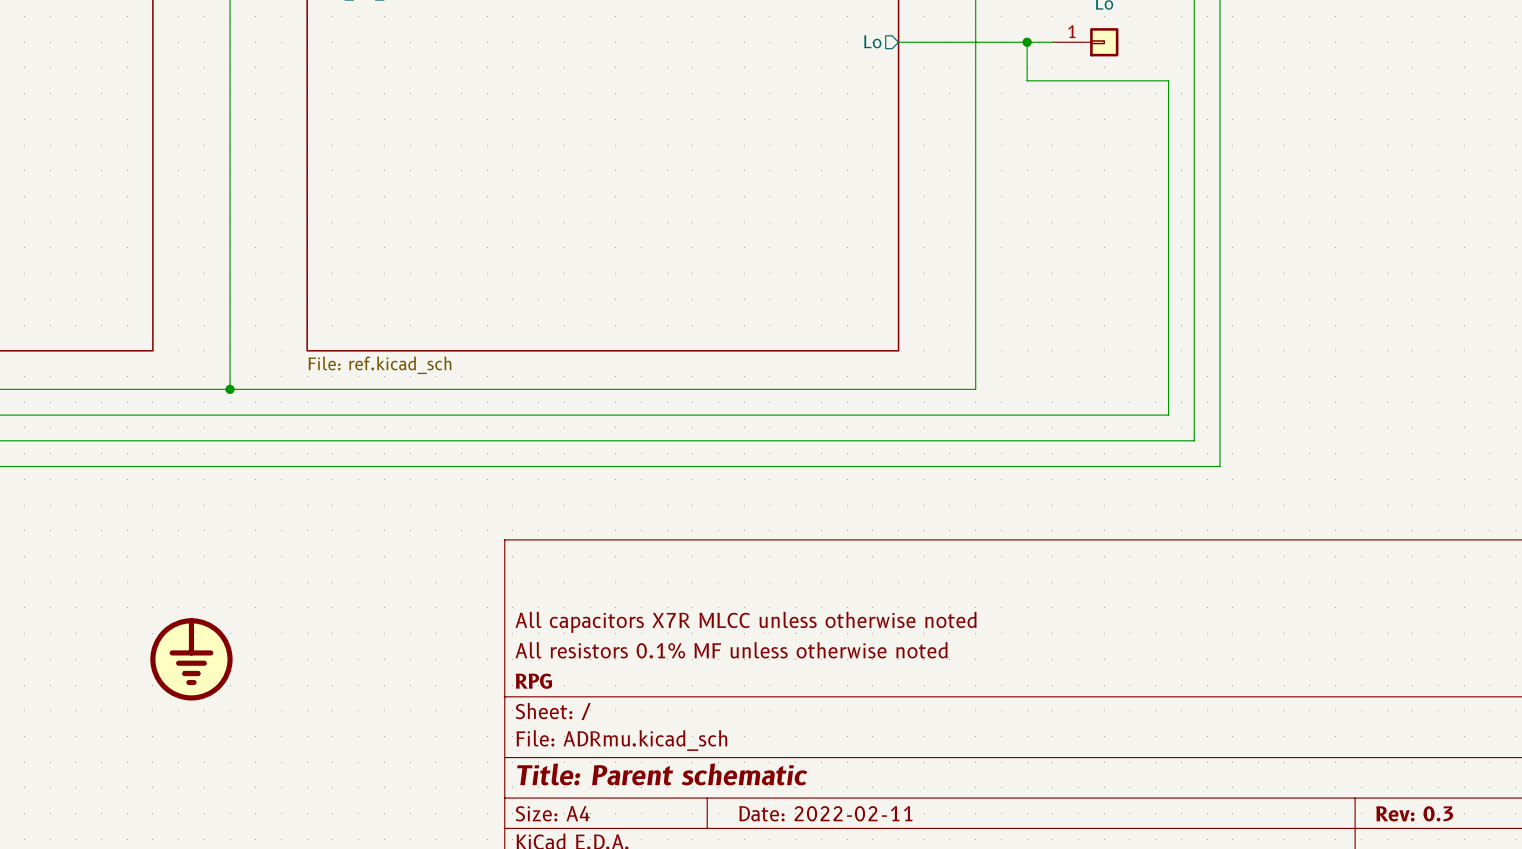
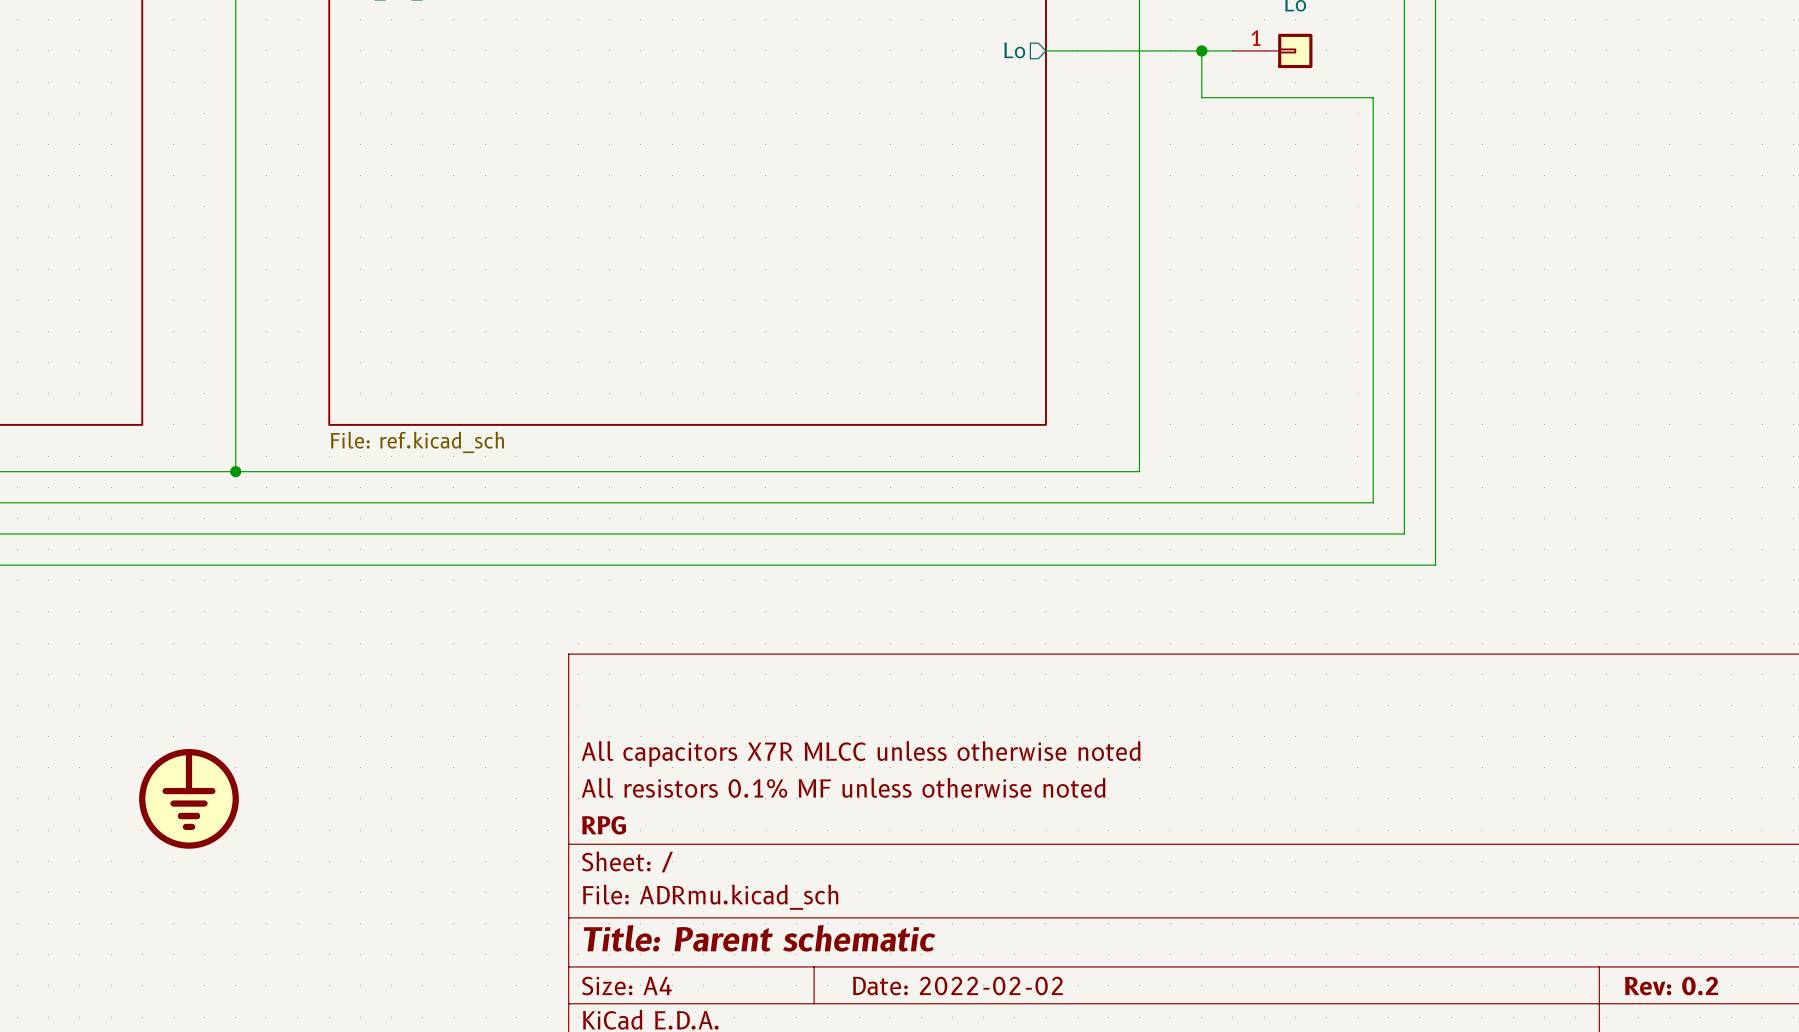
title block: Date: 2022-02-11 (825, 813) -> Date: 2022-02-02 (957, 986)
title block: Rev: 0.3 (1414, 813) -> Rev: 0.2 (1671, 986)

